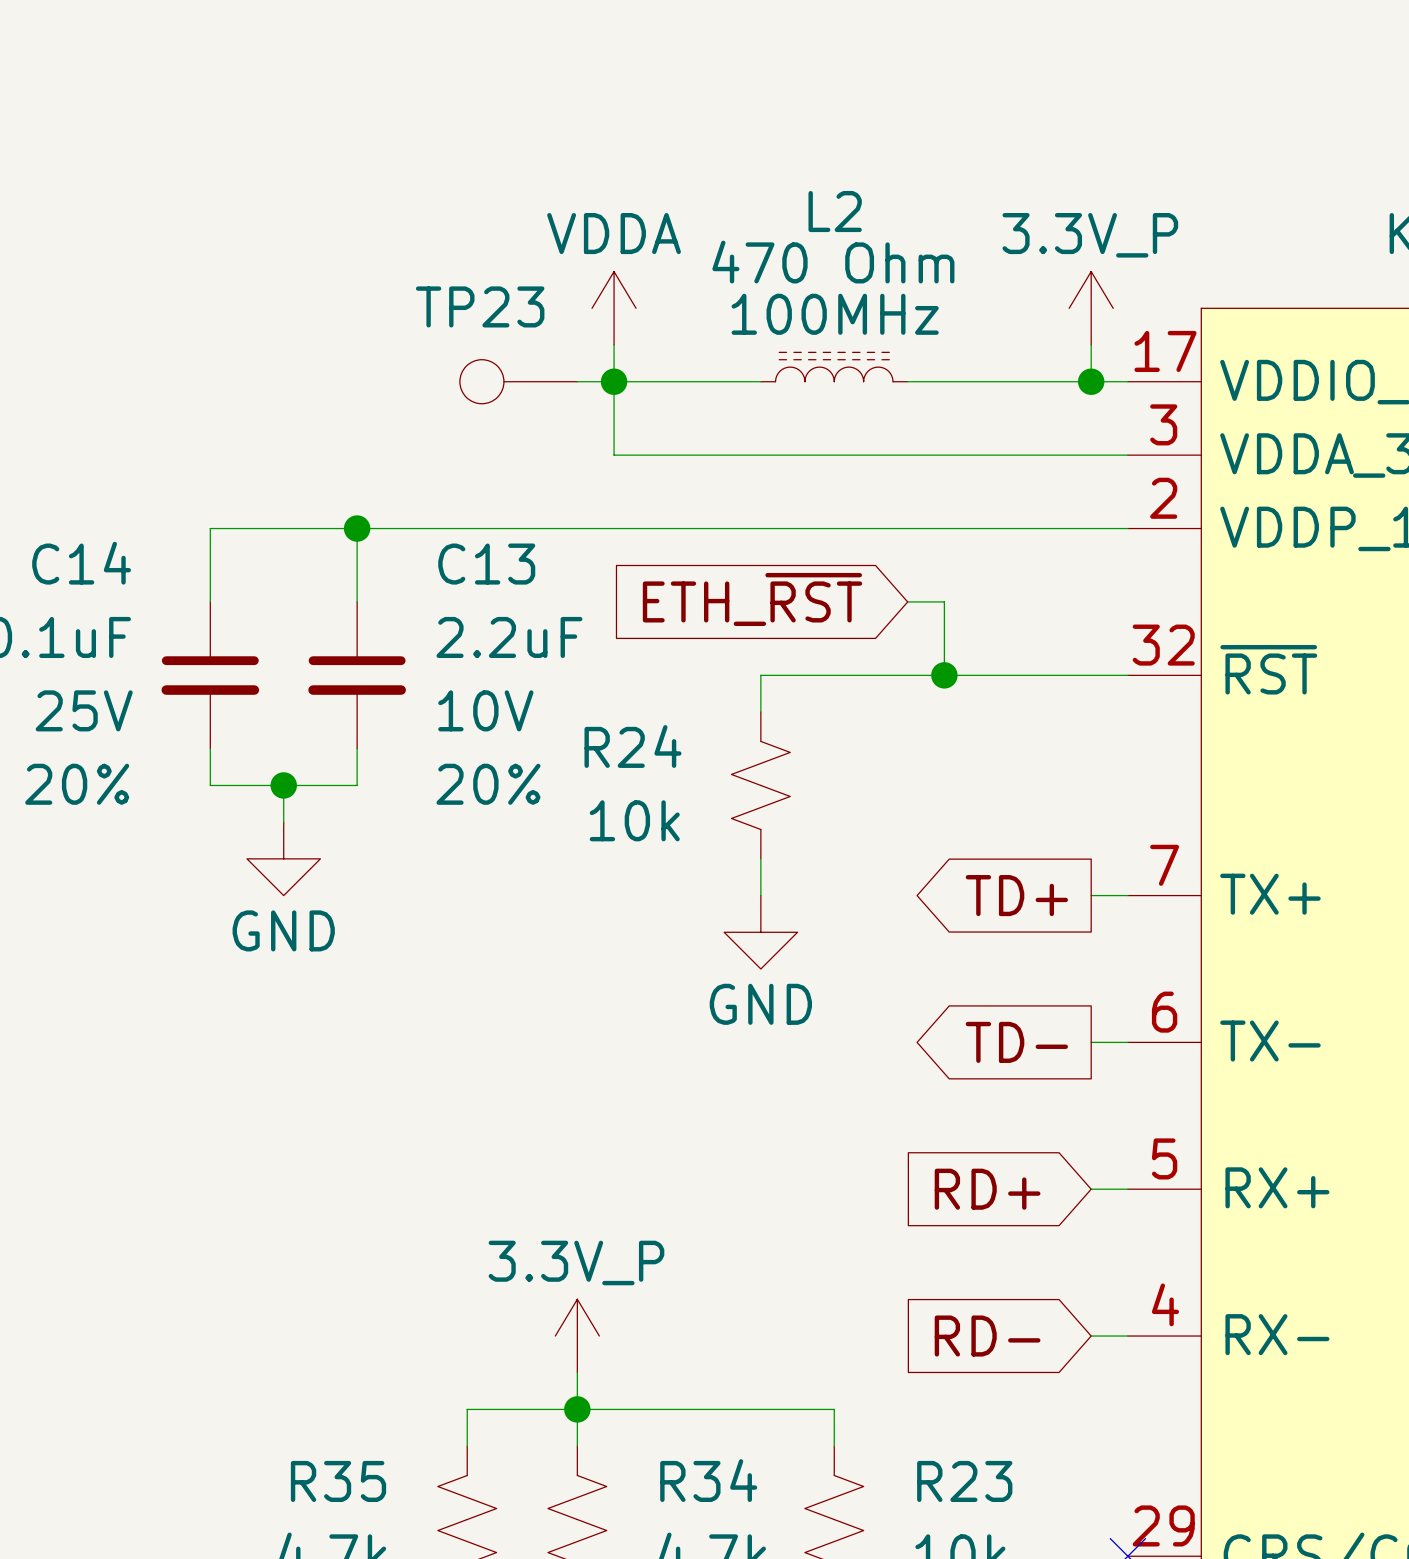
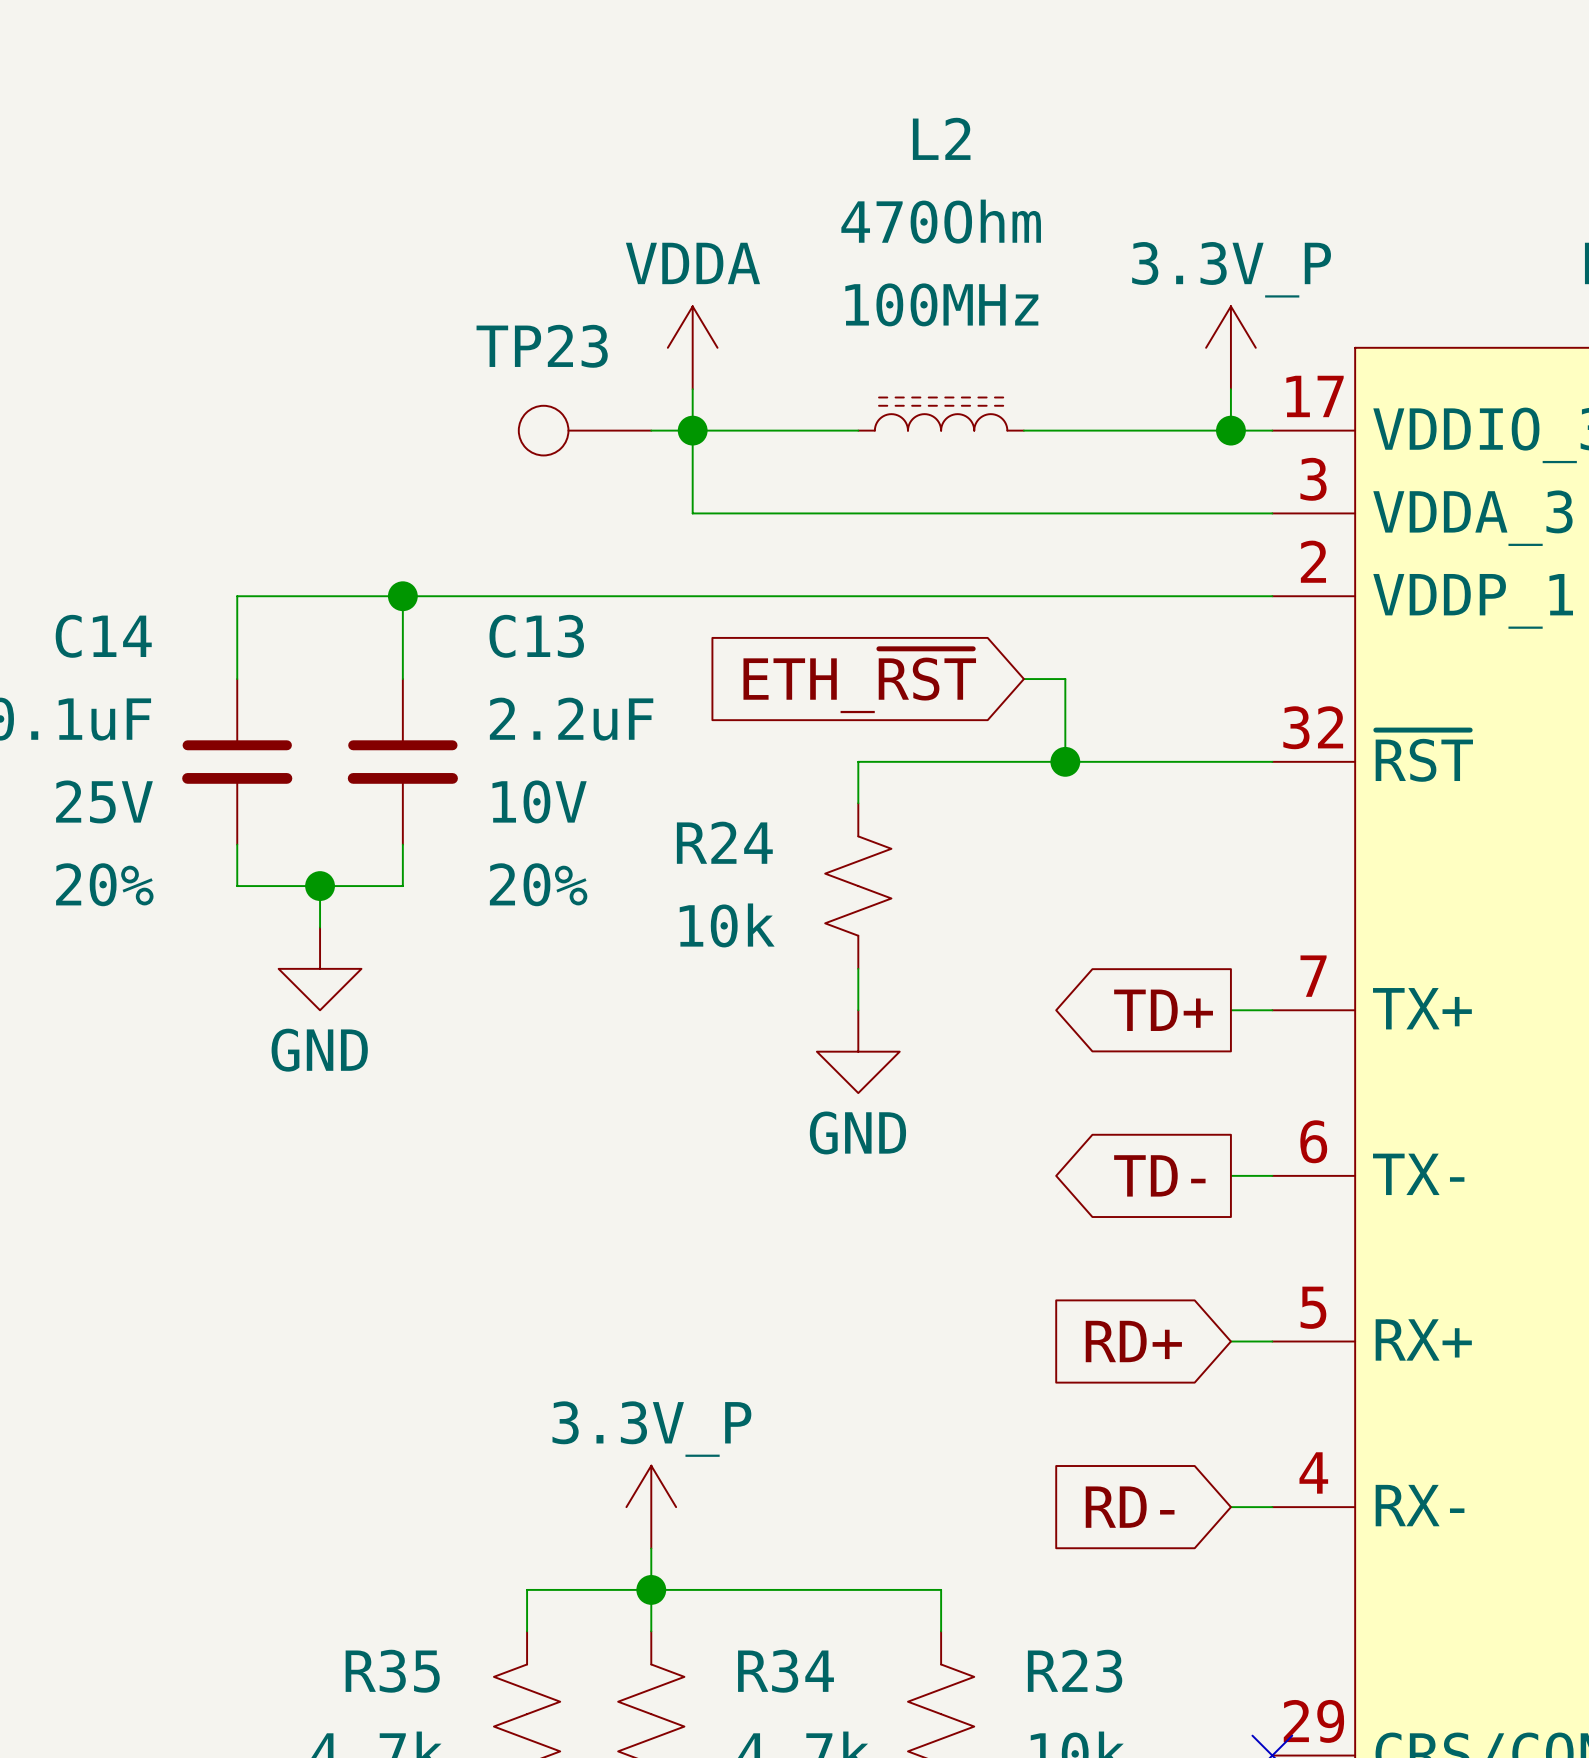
L2 name position: L2 (835, 211) -> L2 (941, 138)
L2 value: 470 Ohm (833, 262) -> 470Ohm (941, 221)
L2 text position: 100MHz (835, 314) -> 100MHz (941, 304)

